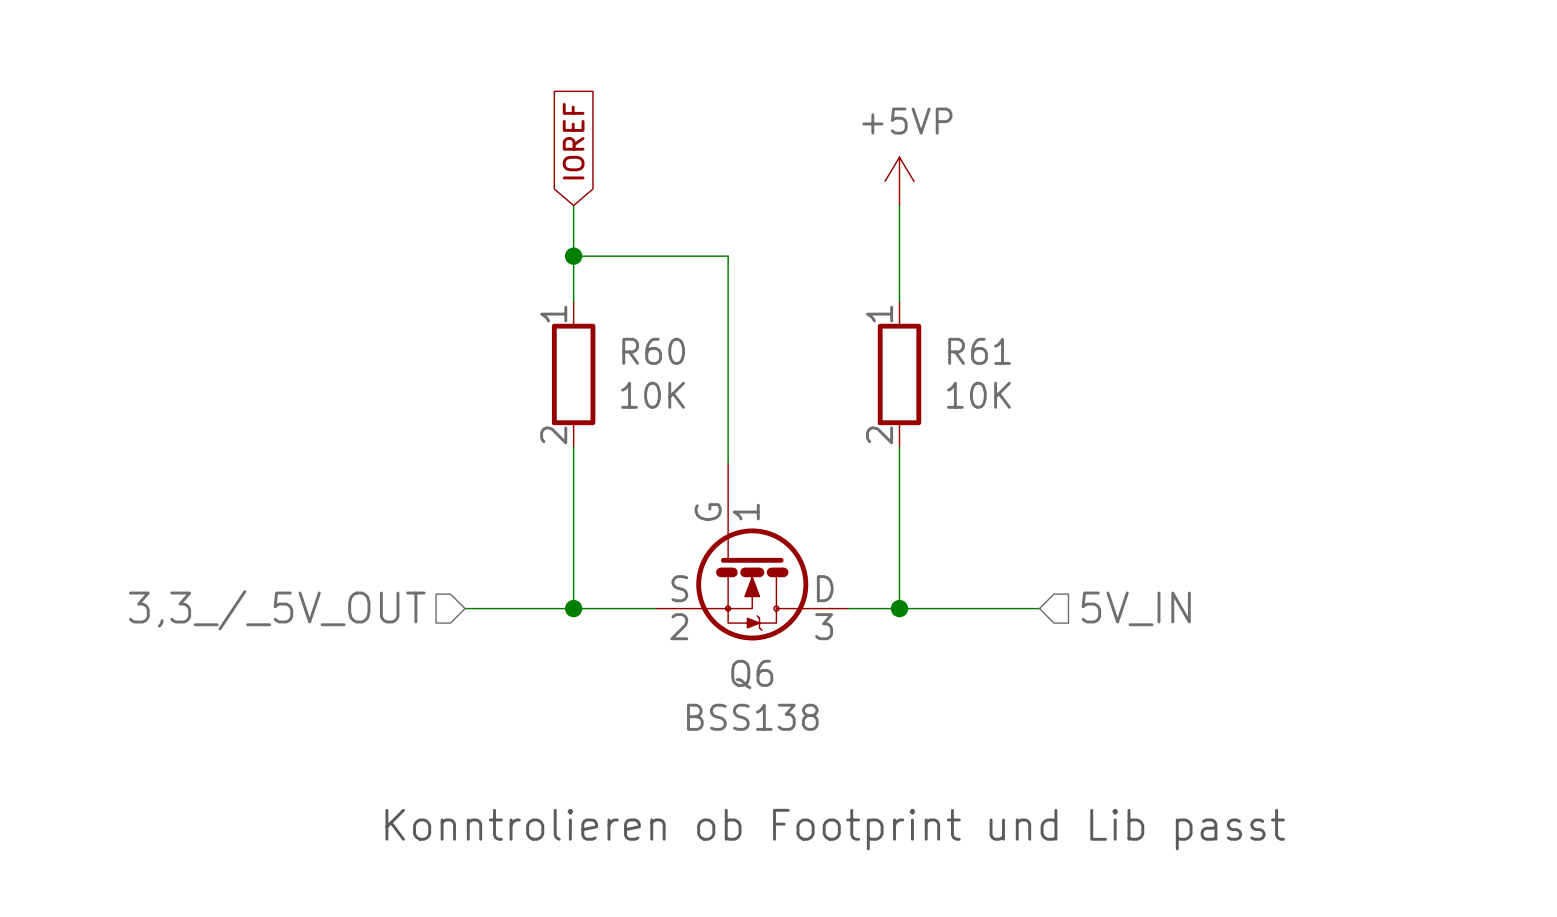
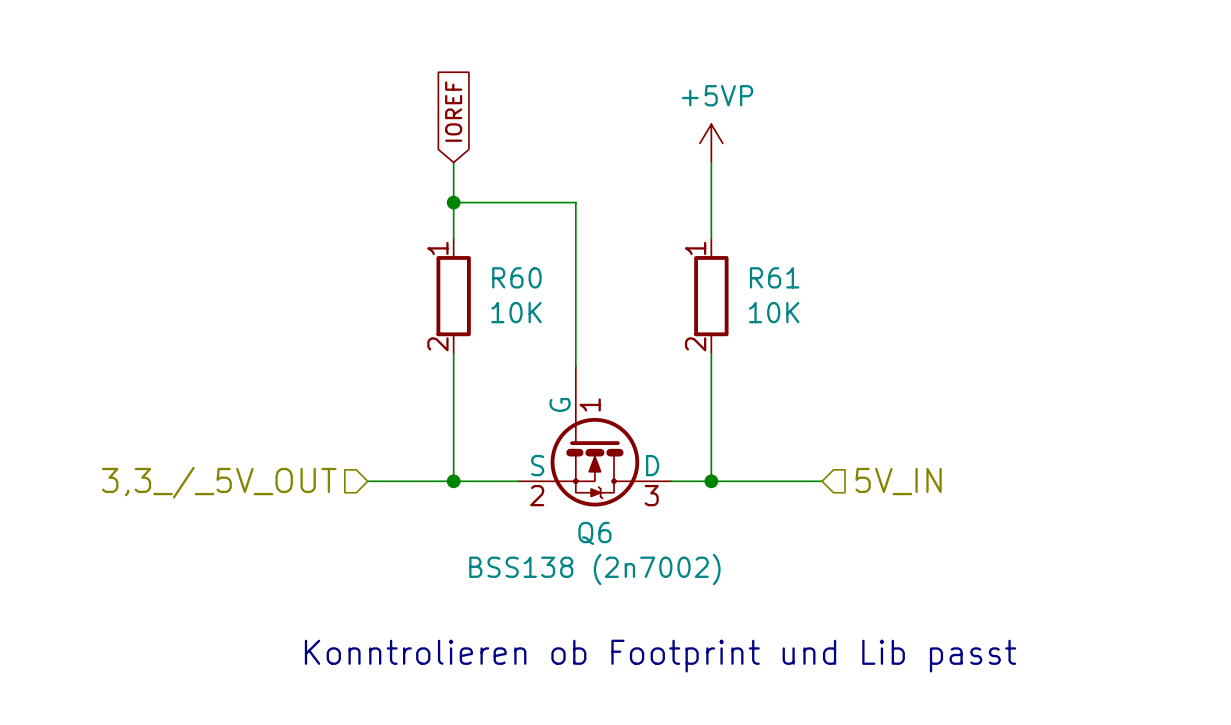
Q6 value: BSS138 (752, 717) -> BSS138 (2n7002) (594, 569)

